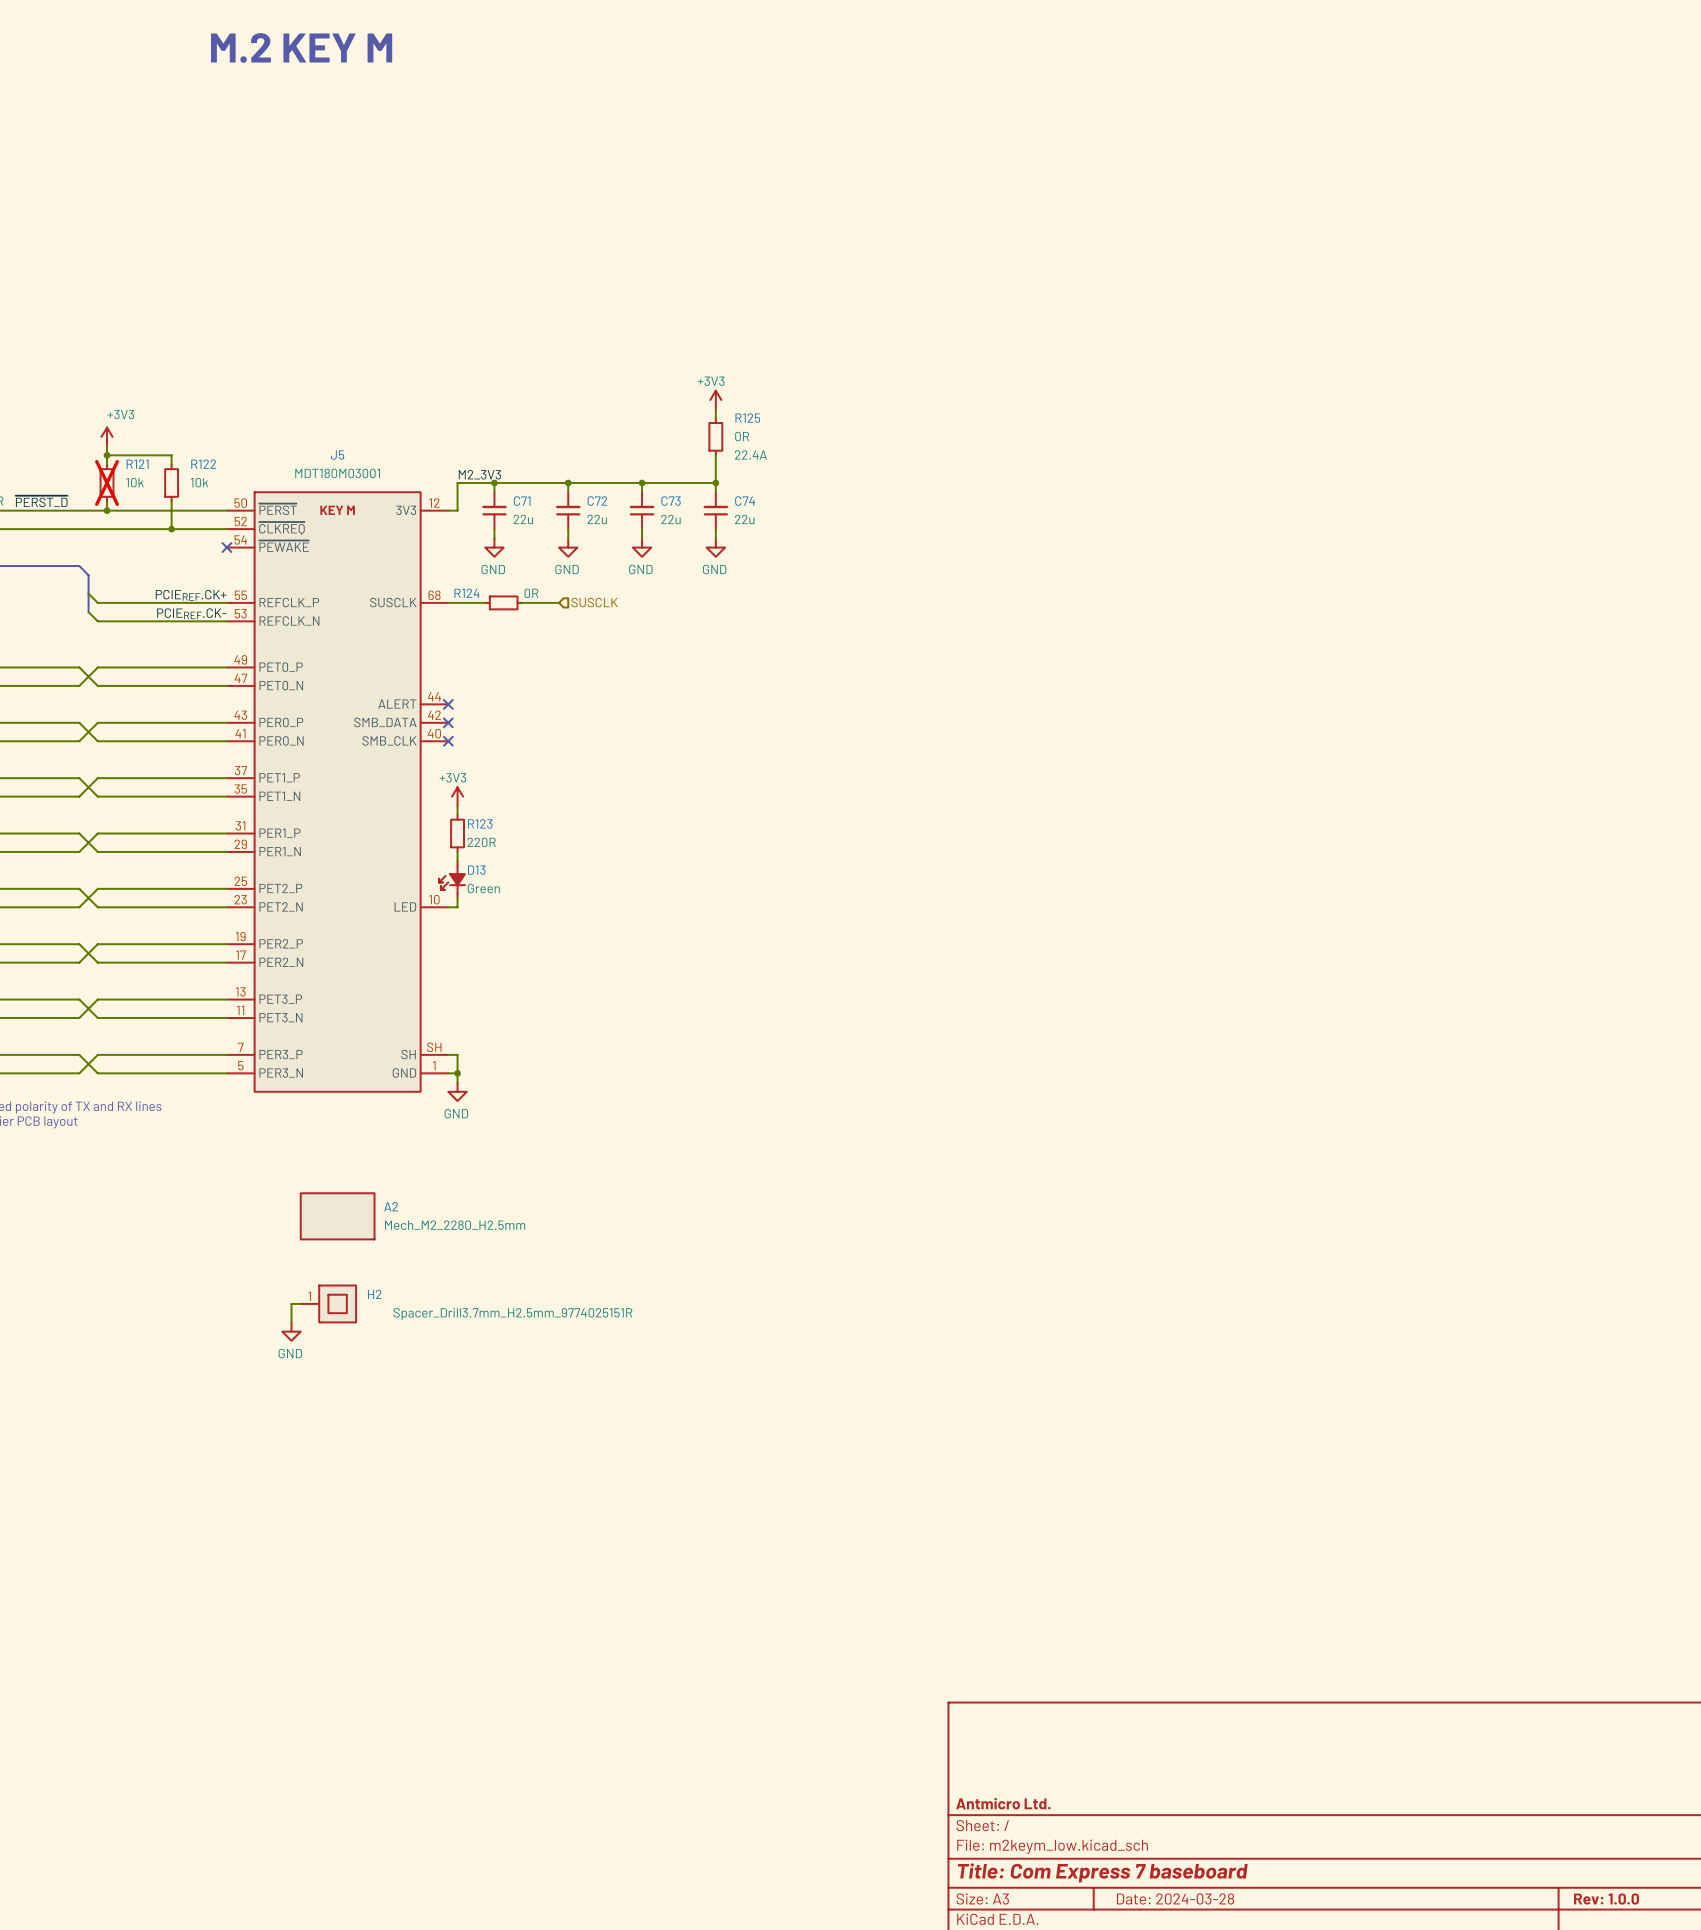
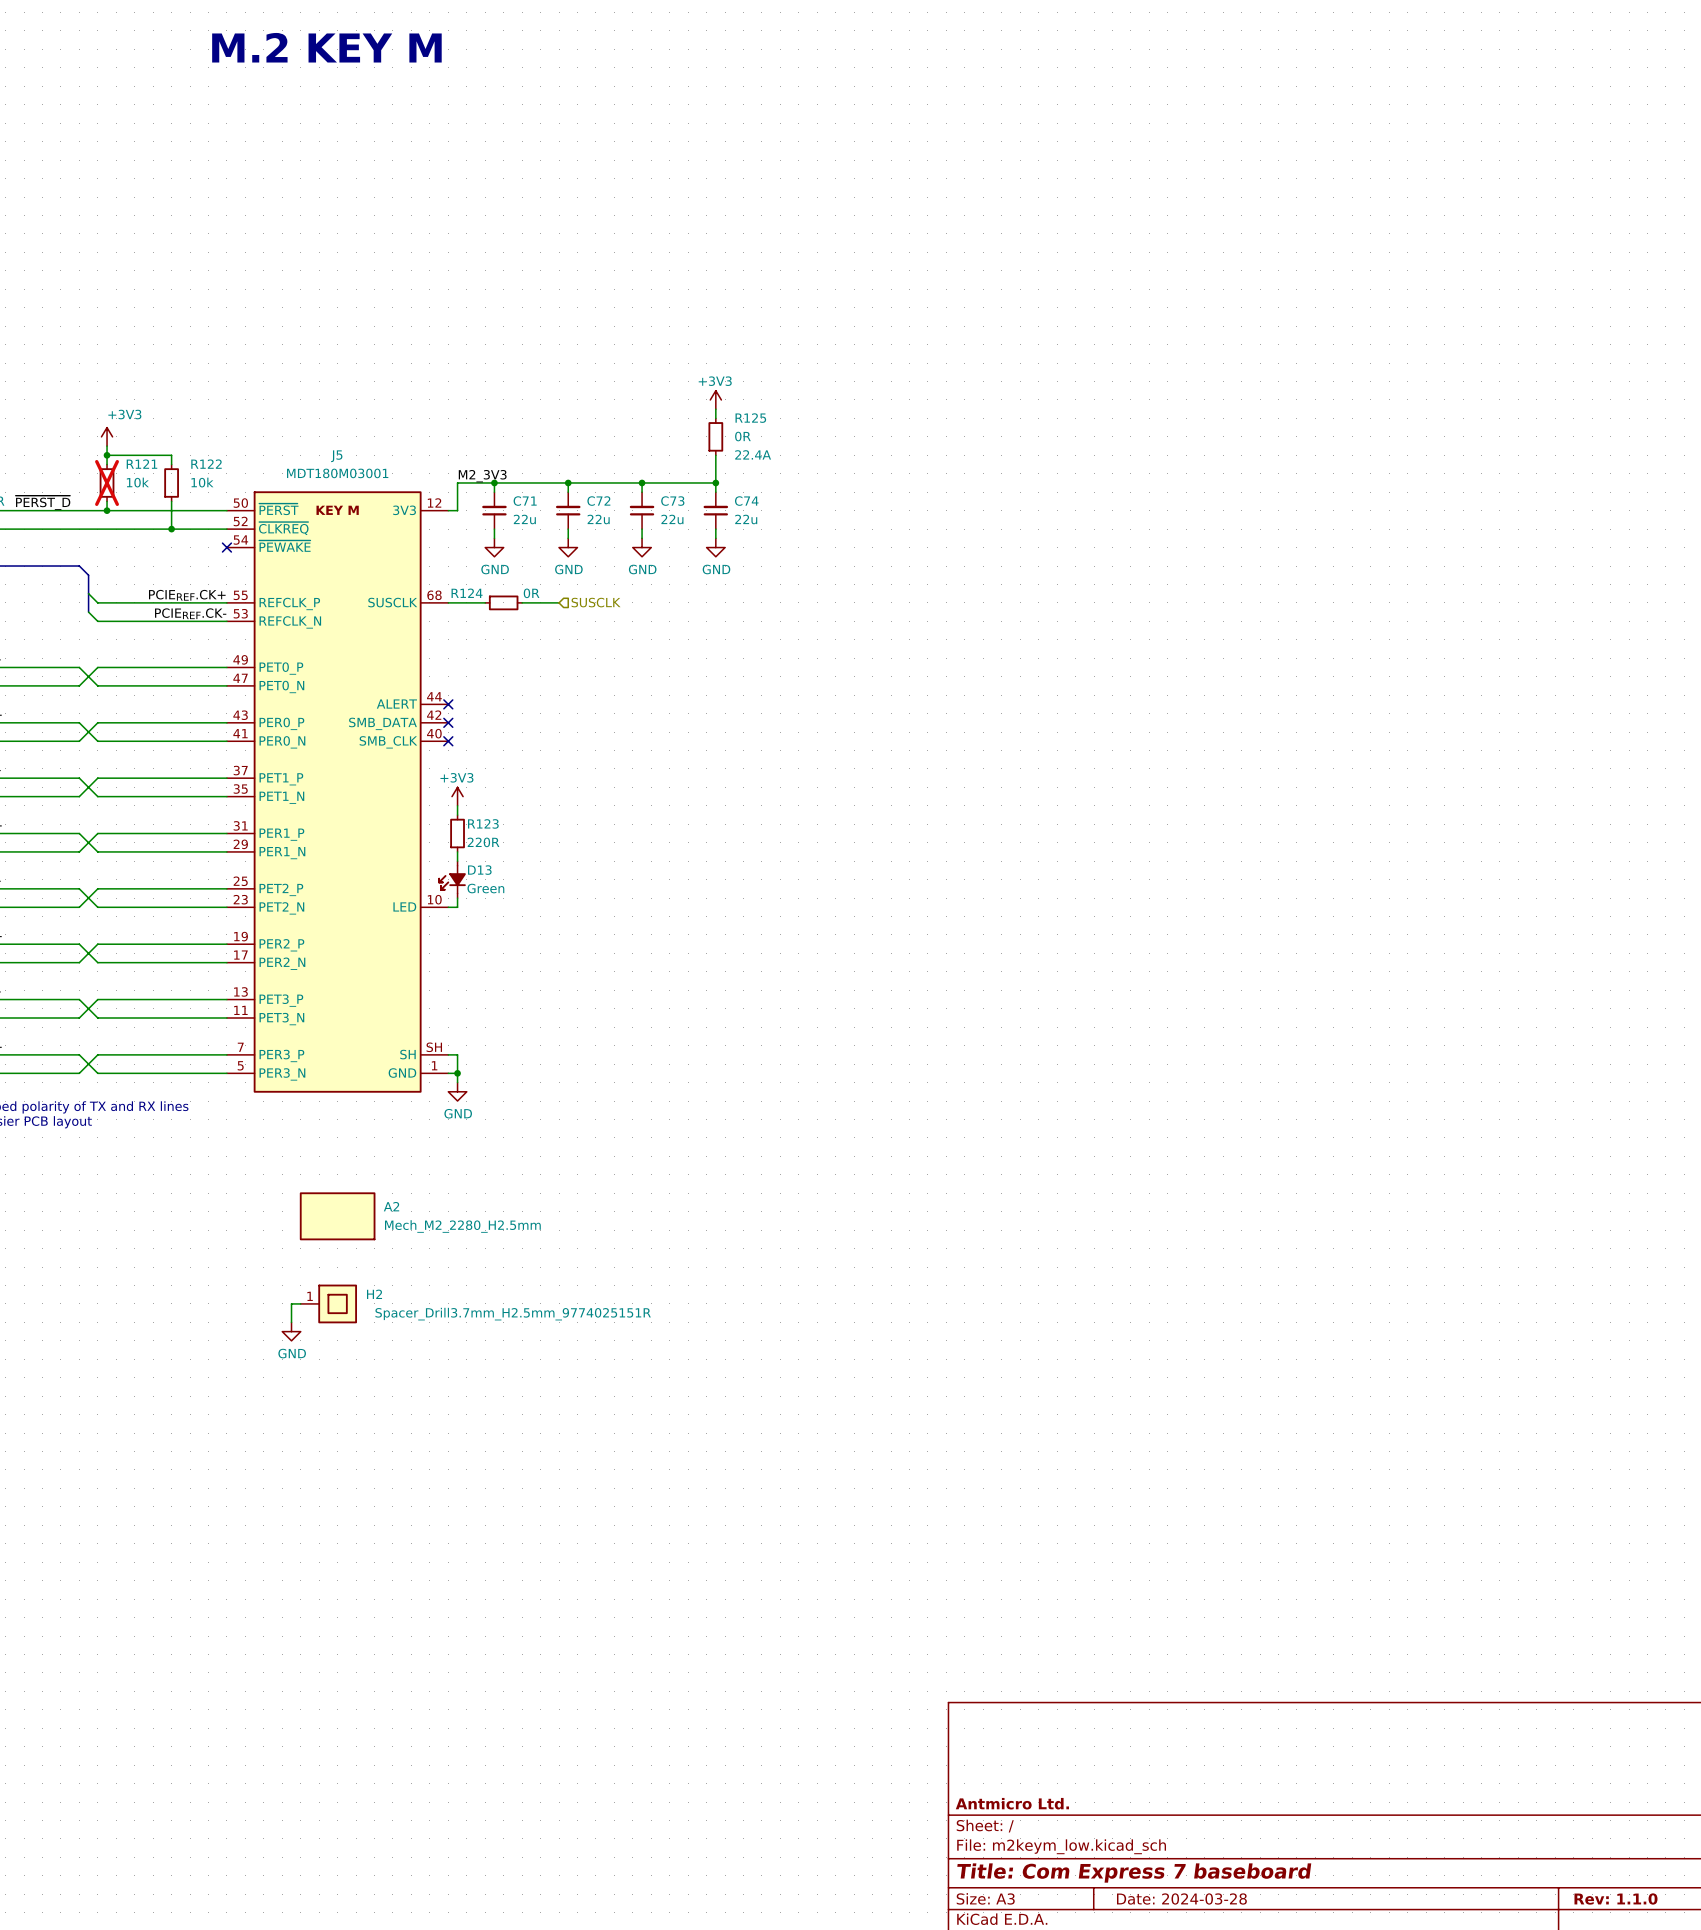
title block: Rev: 1.0.0 (1606, 1899) -> Rev: 1.1.0 (1615, 1898)

